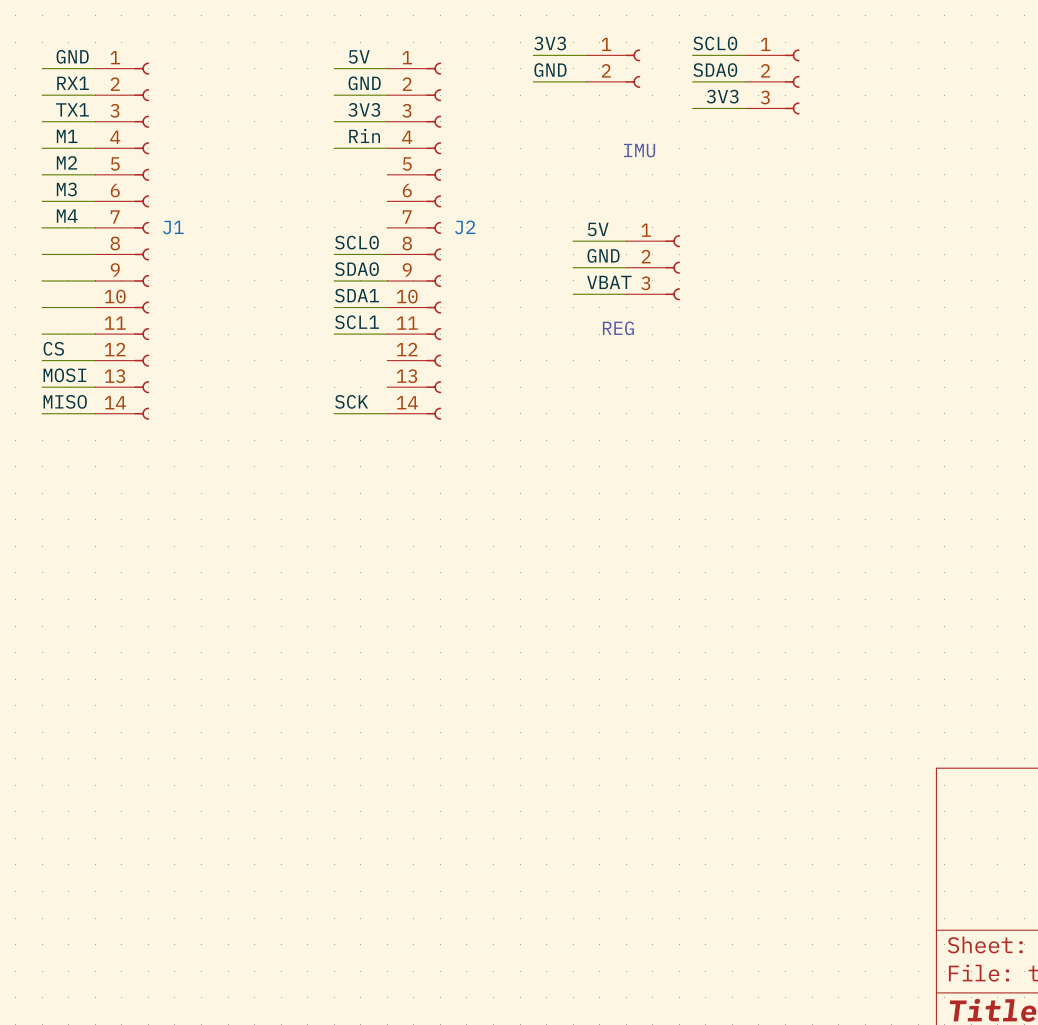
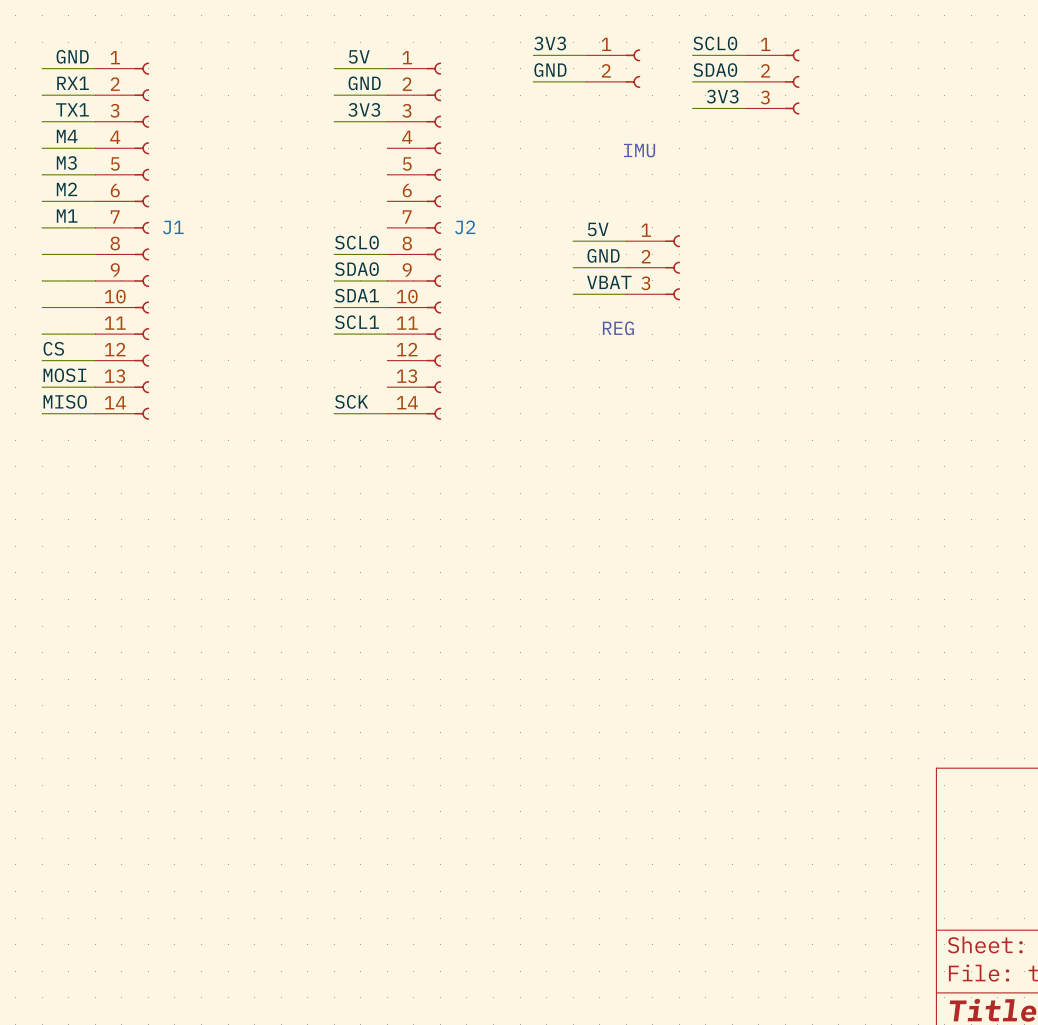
label: Rin (364, 135) -> none
label: M1 (67, 136) -> M4 (67, 136)
wire: (334, 148) (387, 148) -> none
label: M2 (66, 162) -> M3 (66, 162)
label: M3 (66, 189) -> M2 (66, 189)
label: M4 (67, 216) -> M1 (67, 216)

